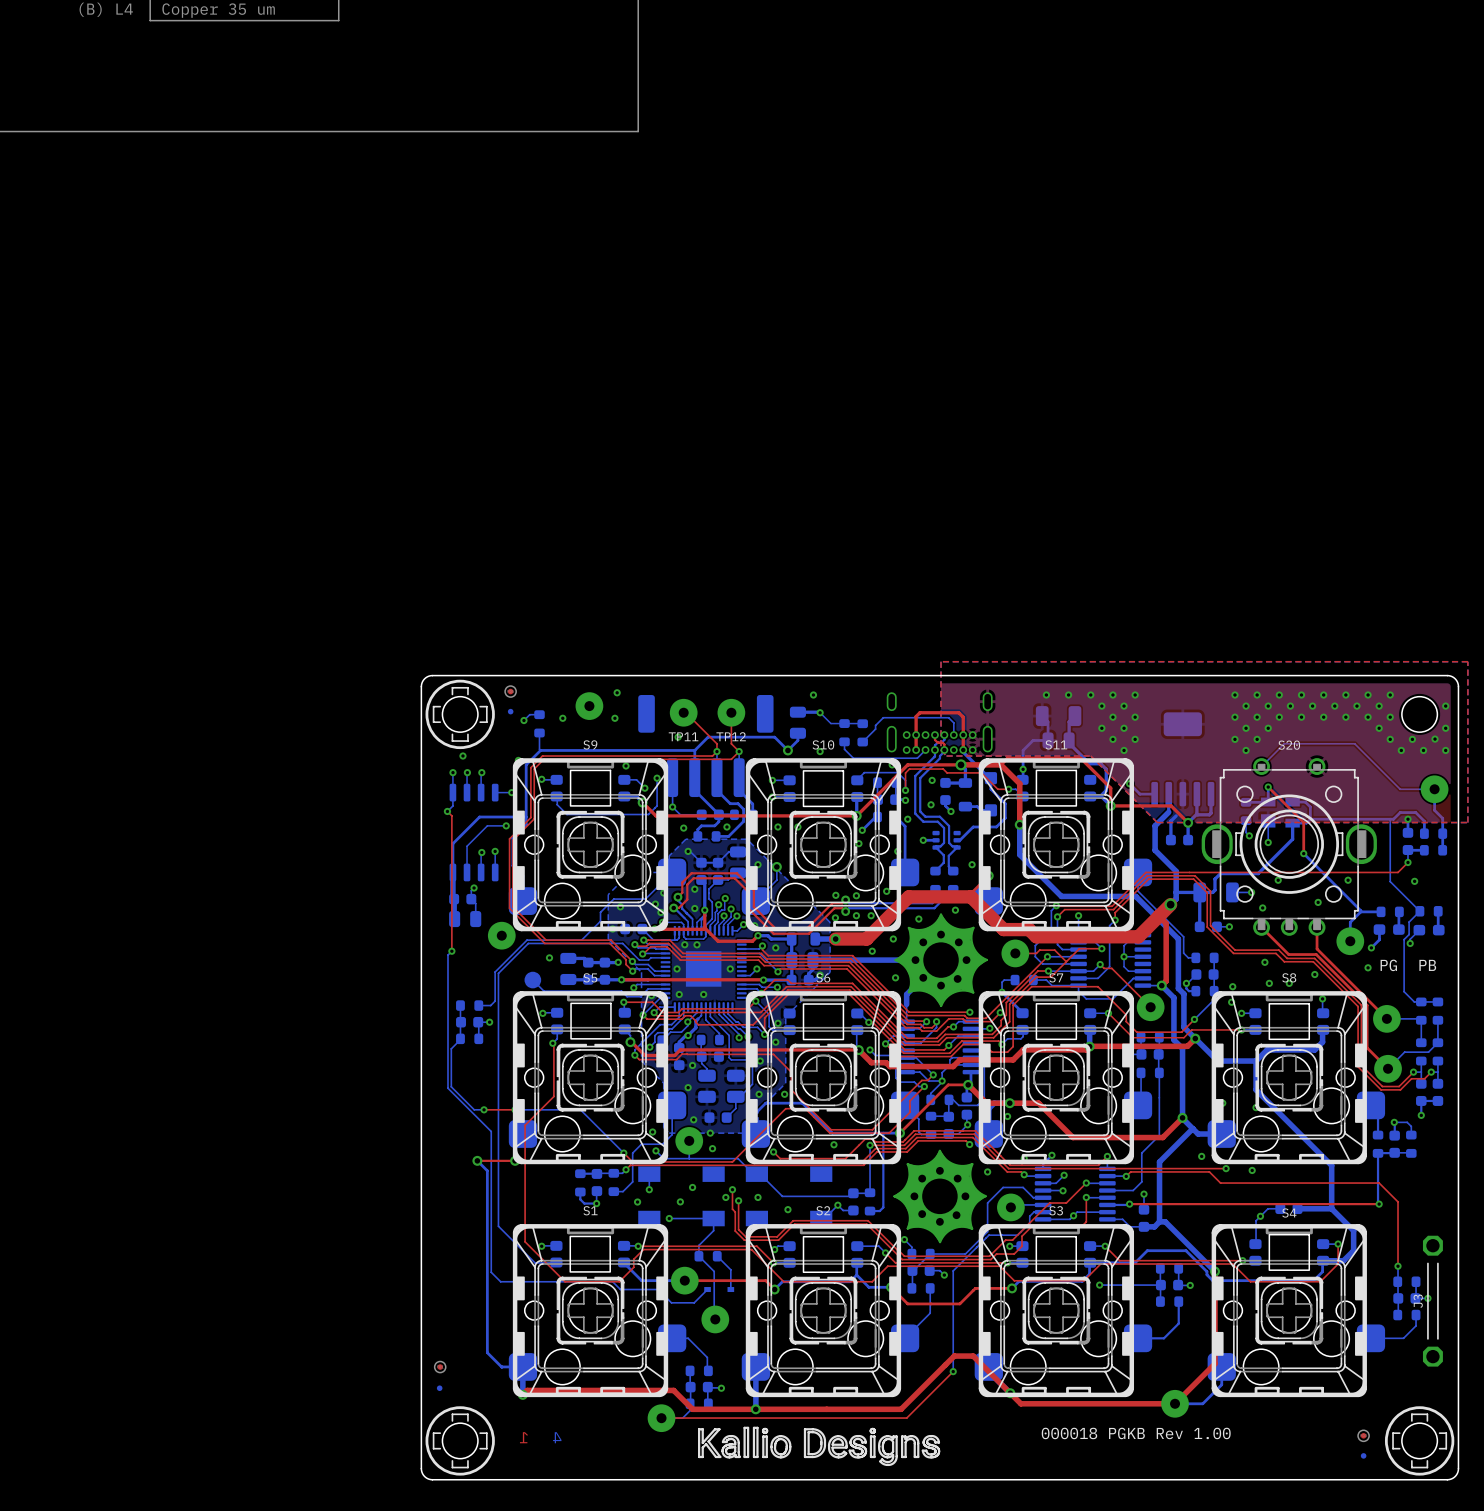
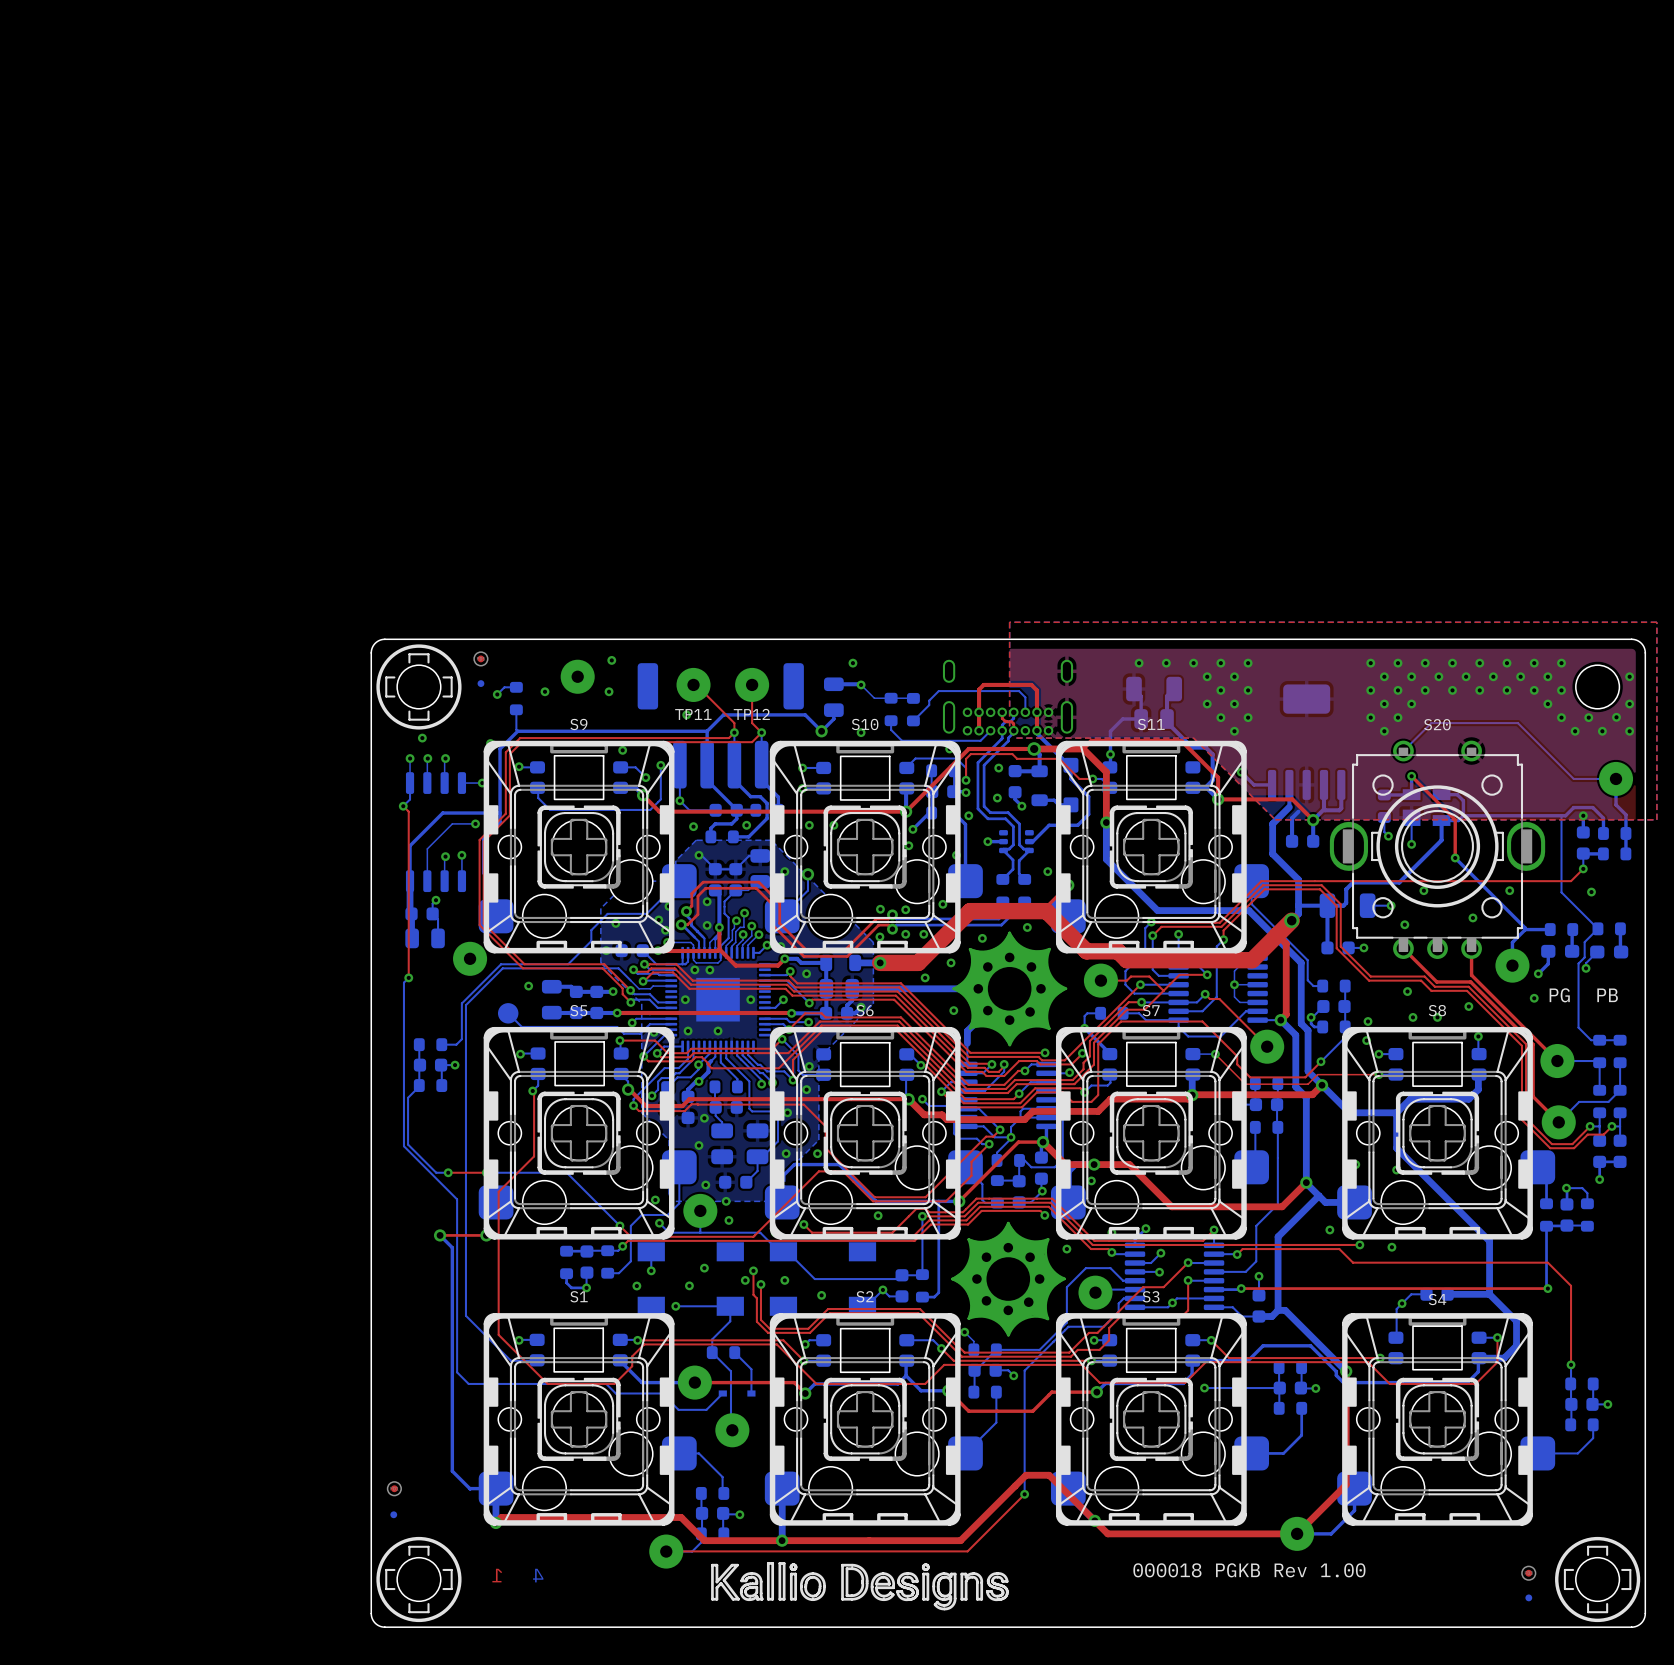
J3: (1432, 1301) -> none

